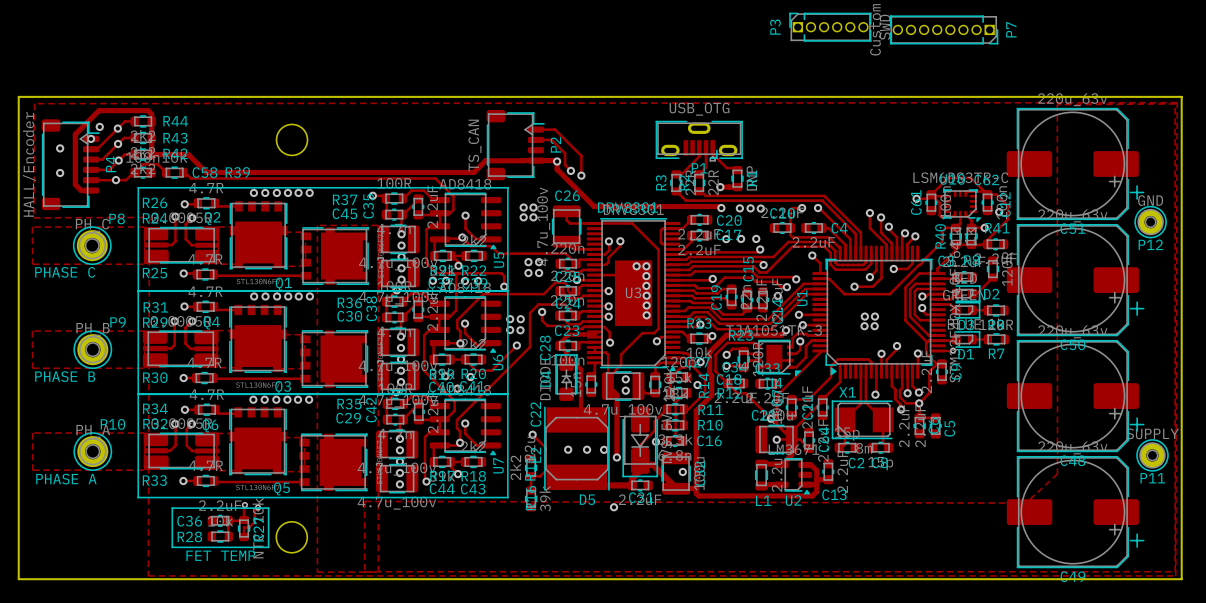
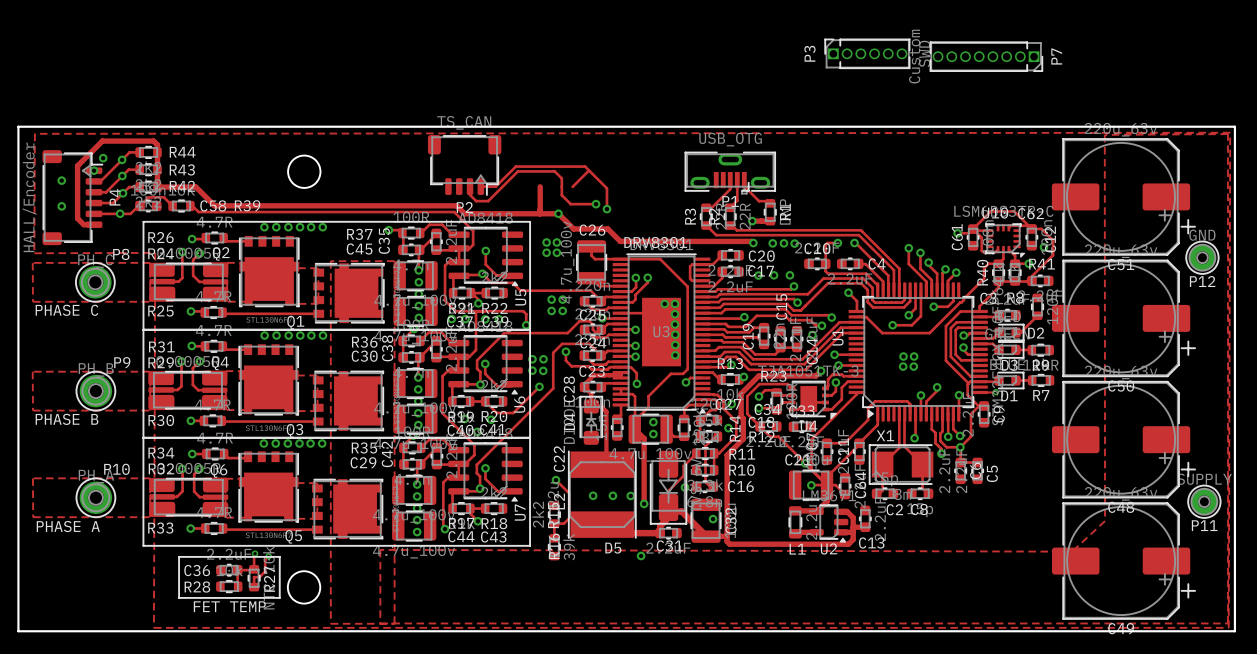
track: (541, 129) (555, 129) (560, 134) -> (480, 186) (495, 186) (515, 166) (585, 166)
track: none -> (588, 170) (572, 186)
track: (541, 139) (551, 139) (565, 153) (565, 165) (570, 170) -> (470, 186) (470, 194) (476, 201) (488, 201) (517, 171) (554, 171) (561, 178) (561, 195) (570, 204) (596, 204)
P2 rotation: 0° (515, 145) -> 90° clockwise (464, 165)
P2 position: (515, 145) -> (464, 165)
track: none -> (540, 186) (539, 213)
via position: (557, 161) -> (558, 213)
track: (437, 172) (474, 172) (485, 160) (556, 160) (557, 169) (582, 194) -> (456, 205) (464, 213) (558, 213) (573, 228) (607, 228)

